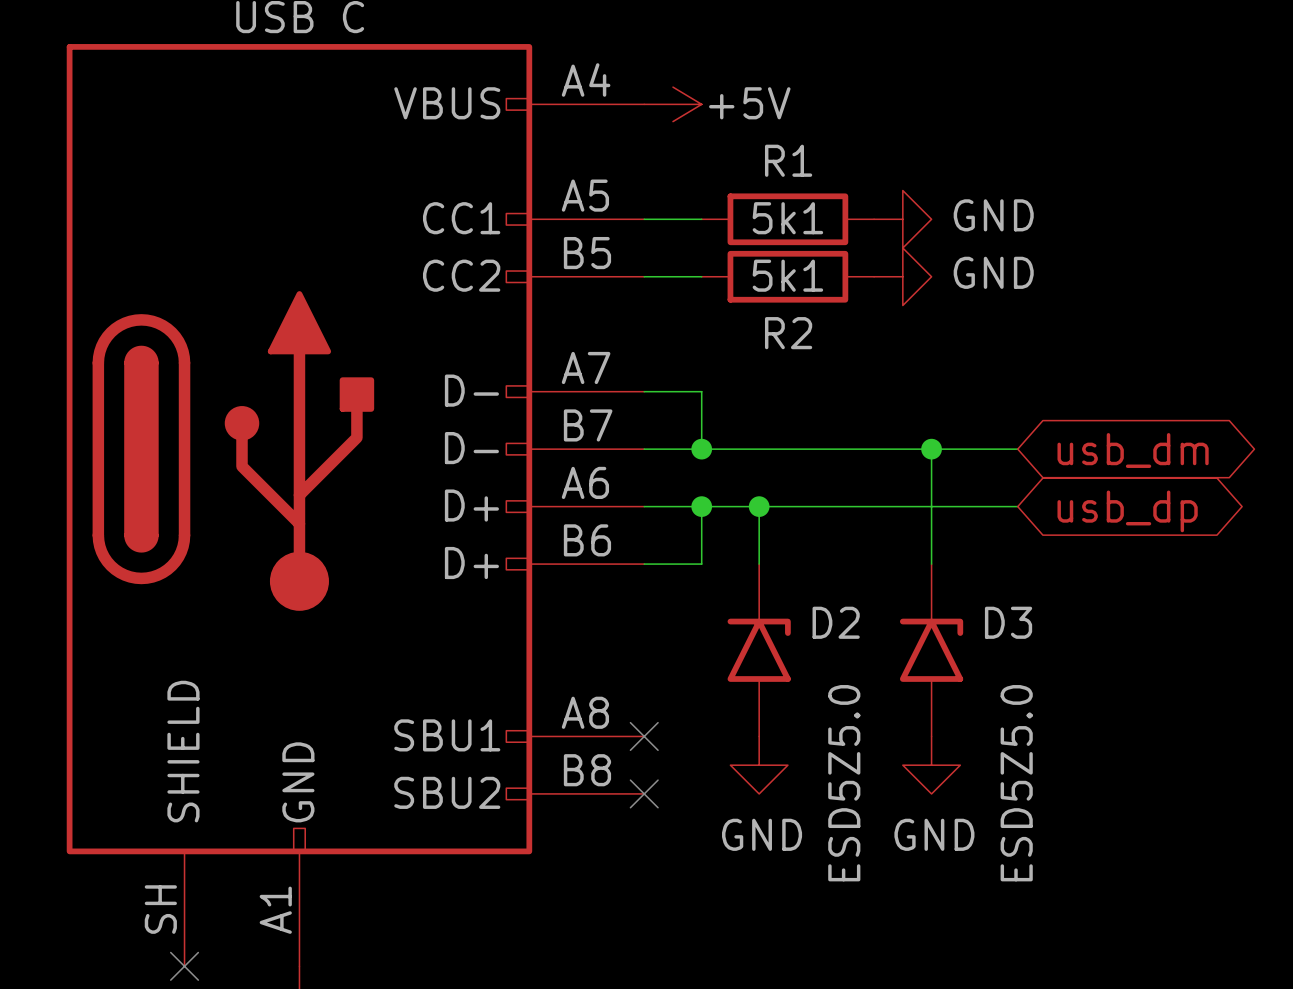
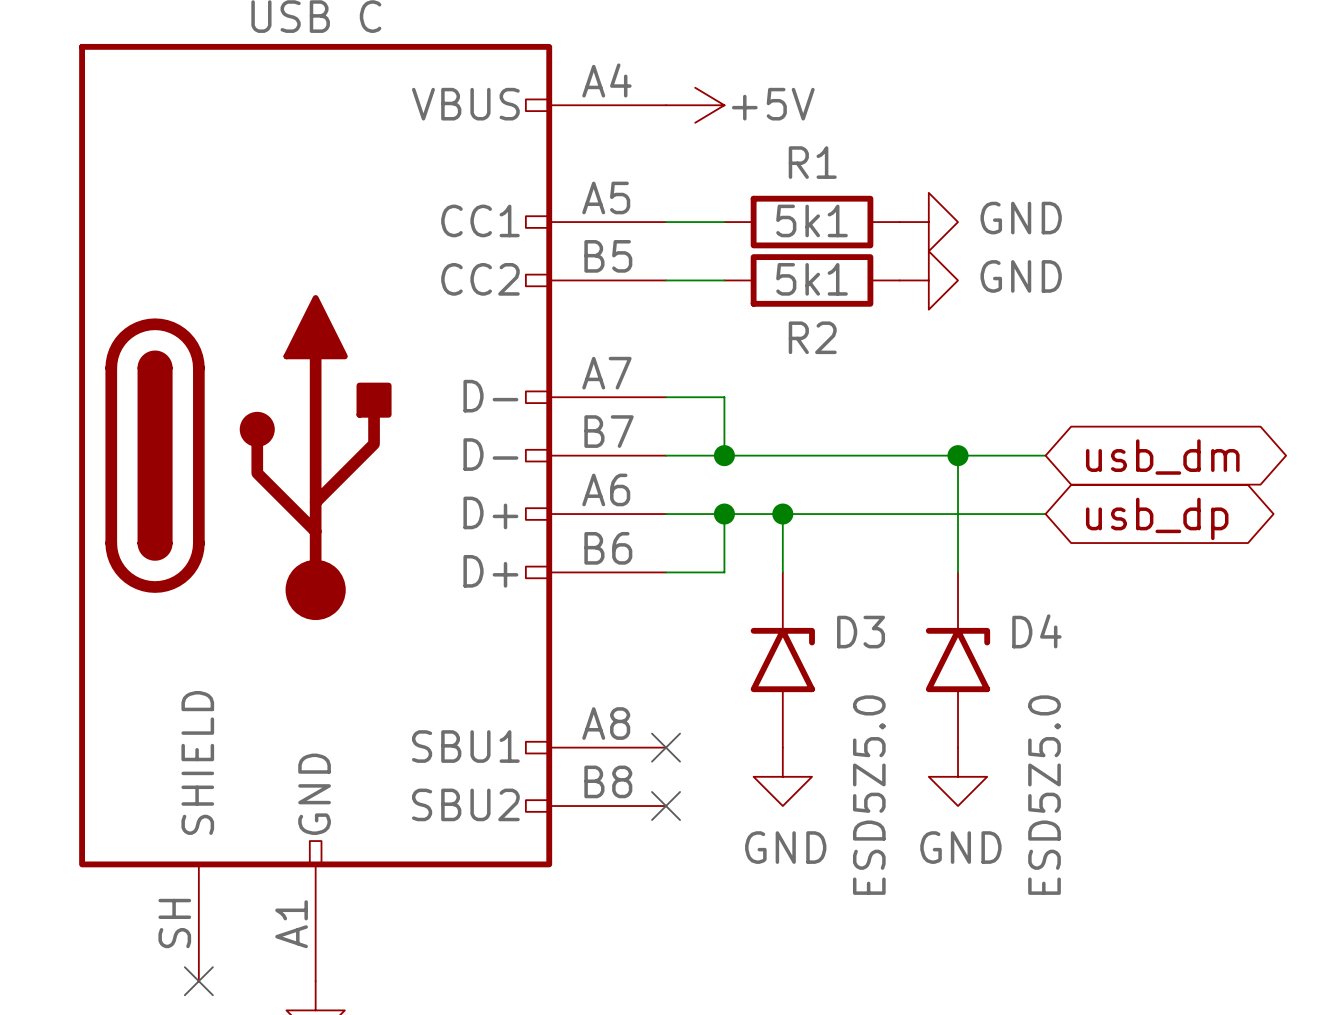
D2 name: D2 (836, 622) -> D3 (861, 632)
D3 name: D3 (1008, 622) -> D4 (1036, 631)

